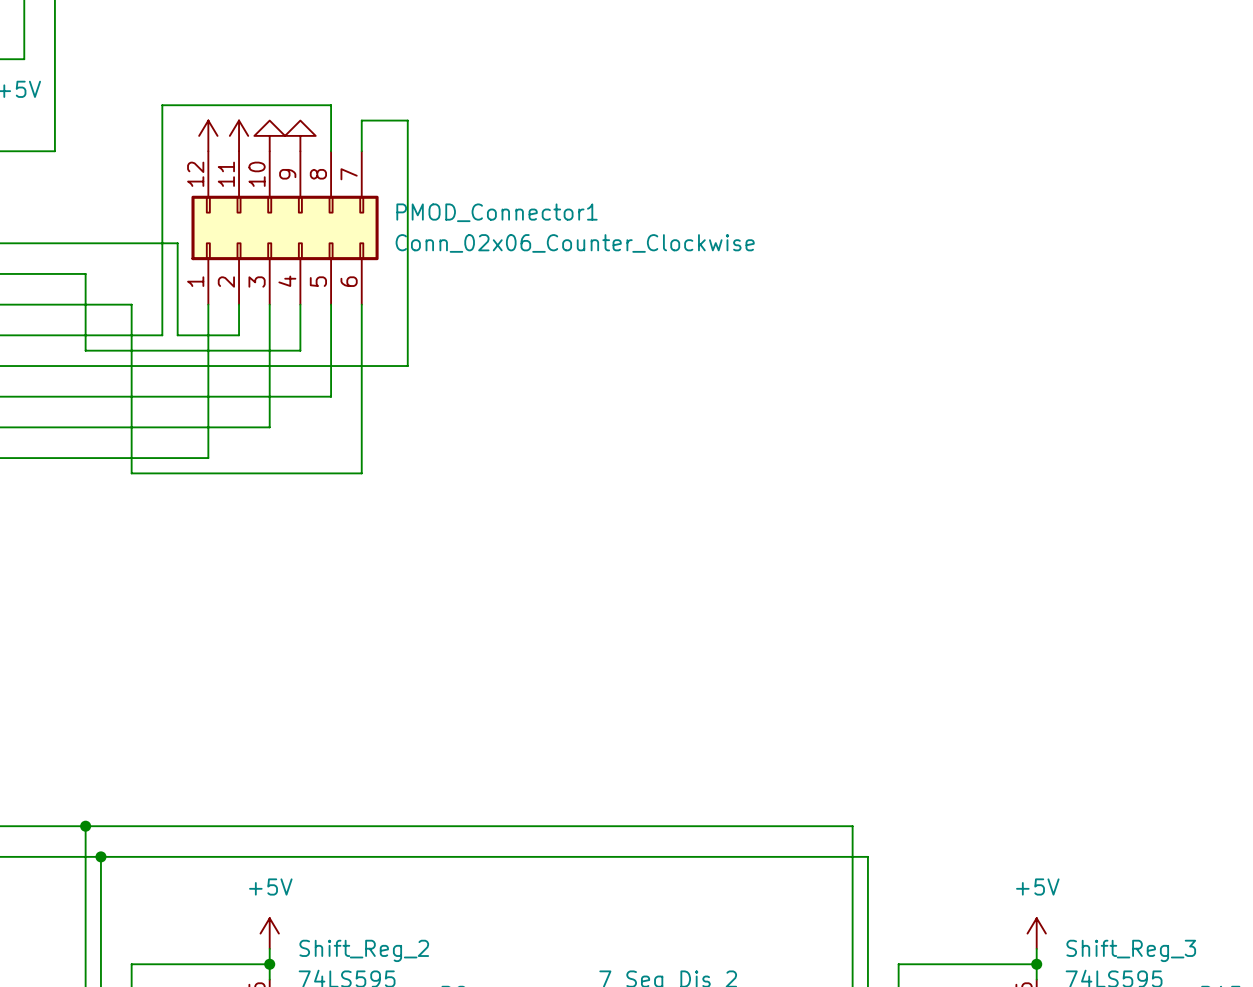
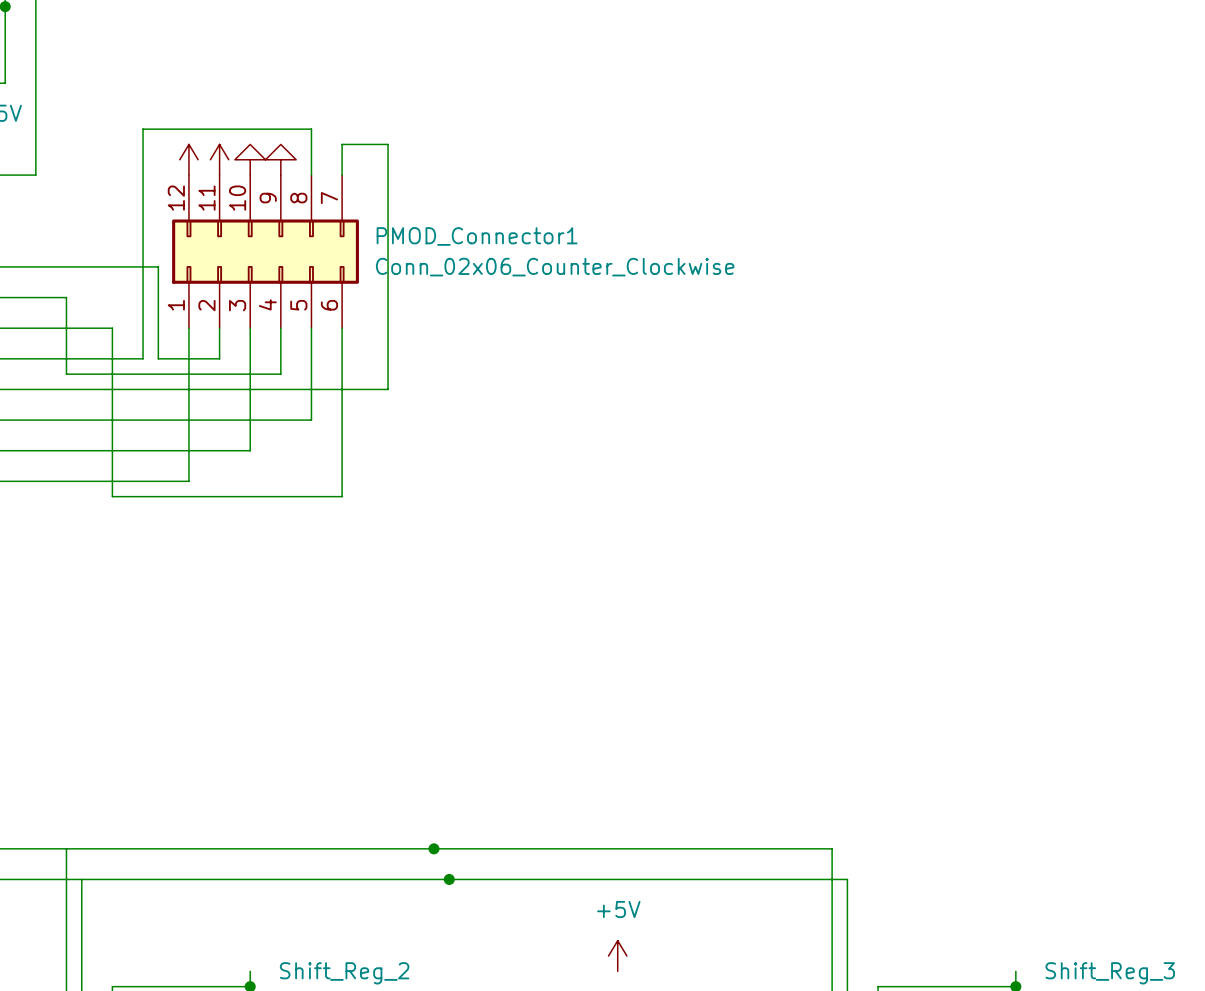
junction: (85, 826) -> none
junction: none -> (433, 848)
junction: (100, 856) -> none
junction: none -> (449, 879)
power symbol: +5V (269, 933) -> none
power symbol: none -> +5V (617, 956)
power symbol: +5V (1036, 933) -> none

